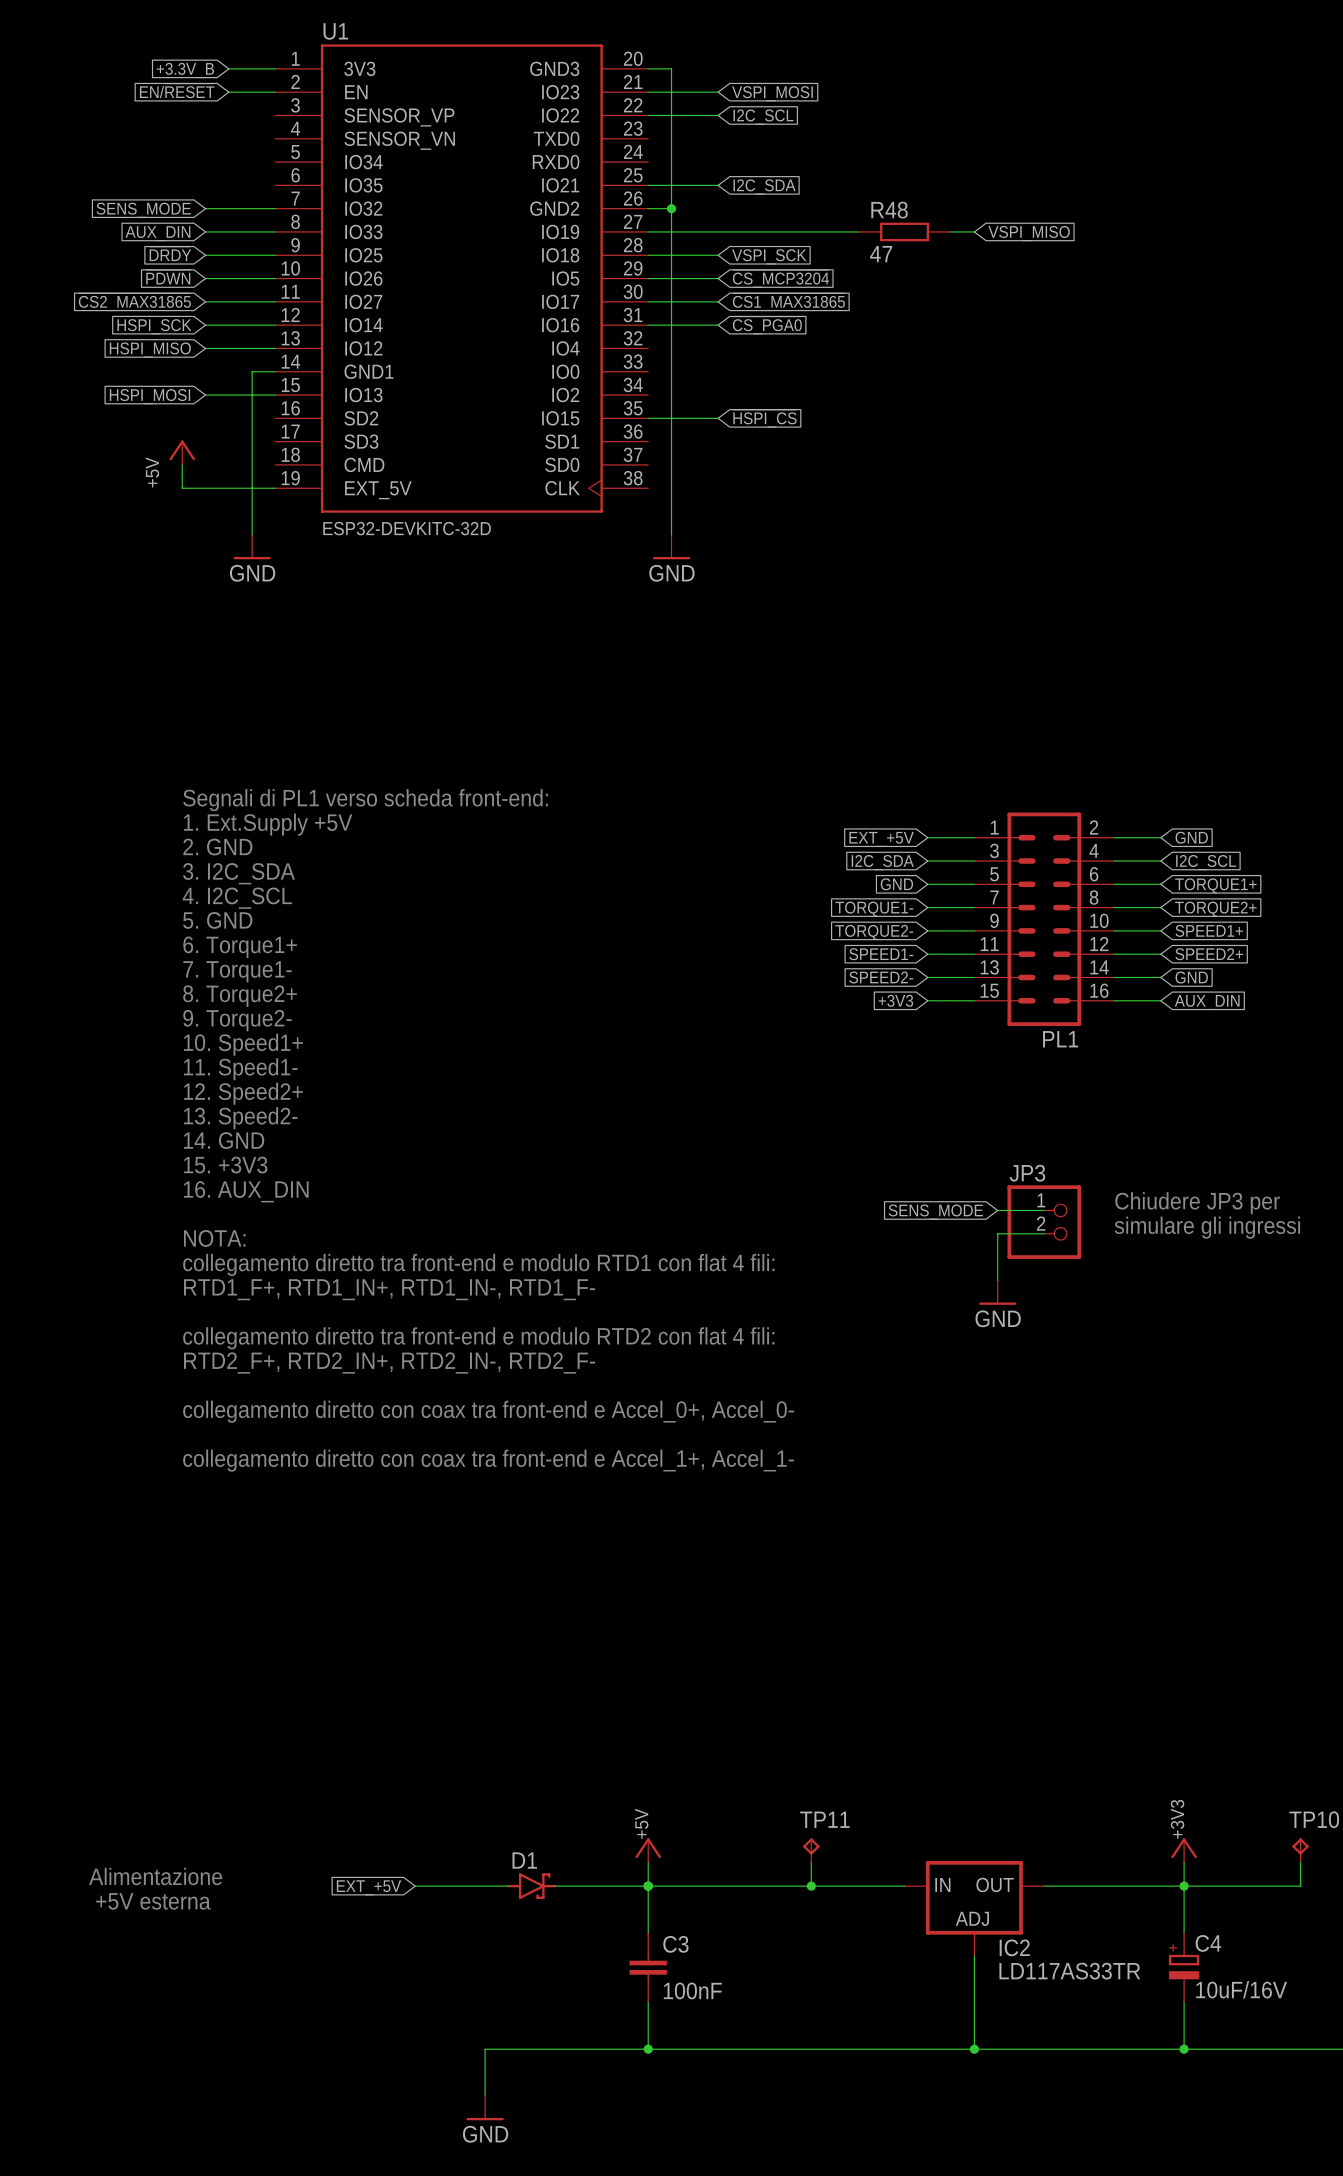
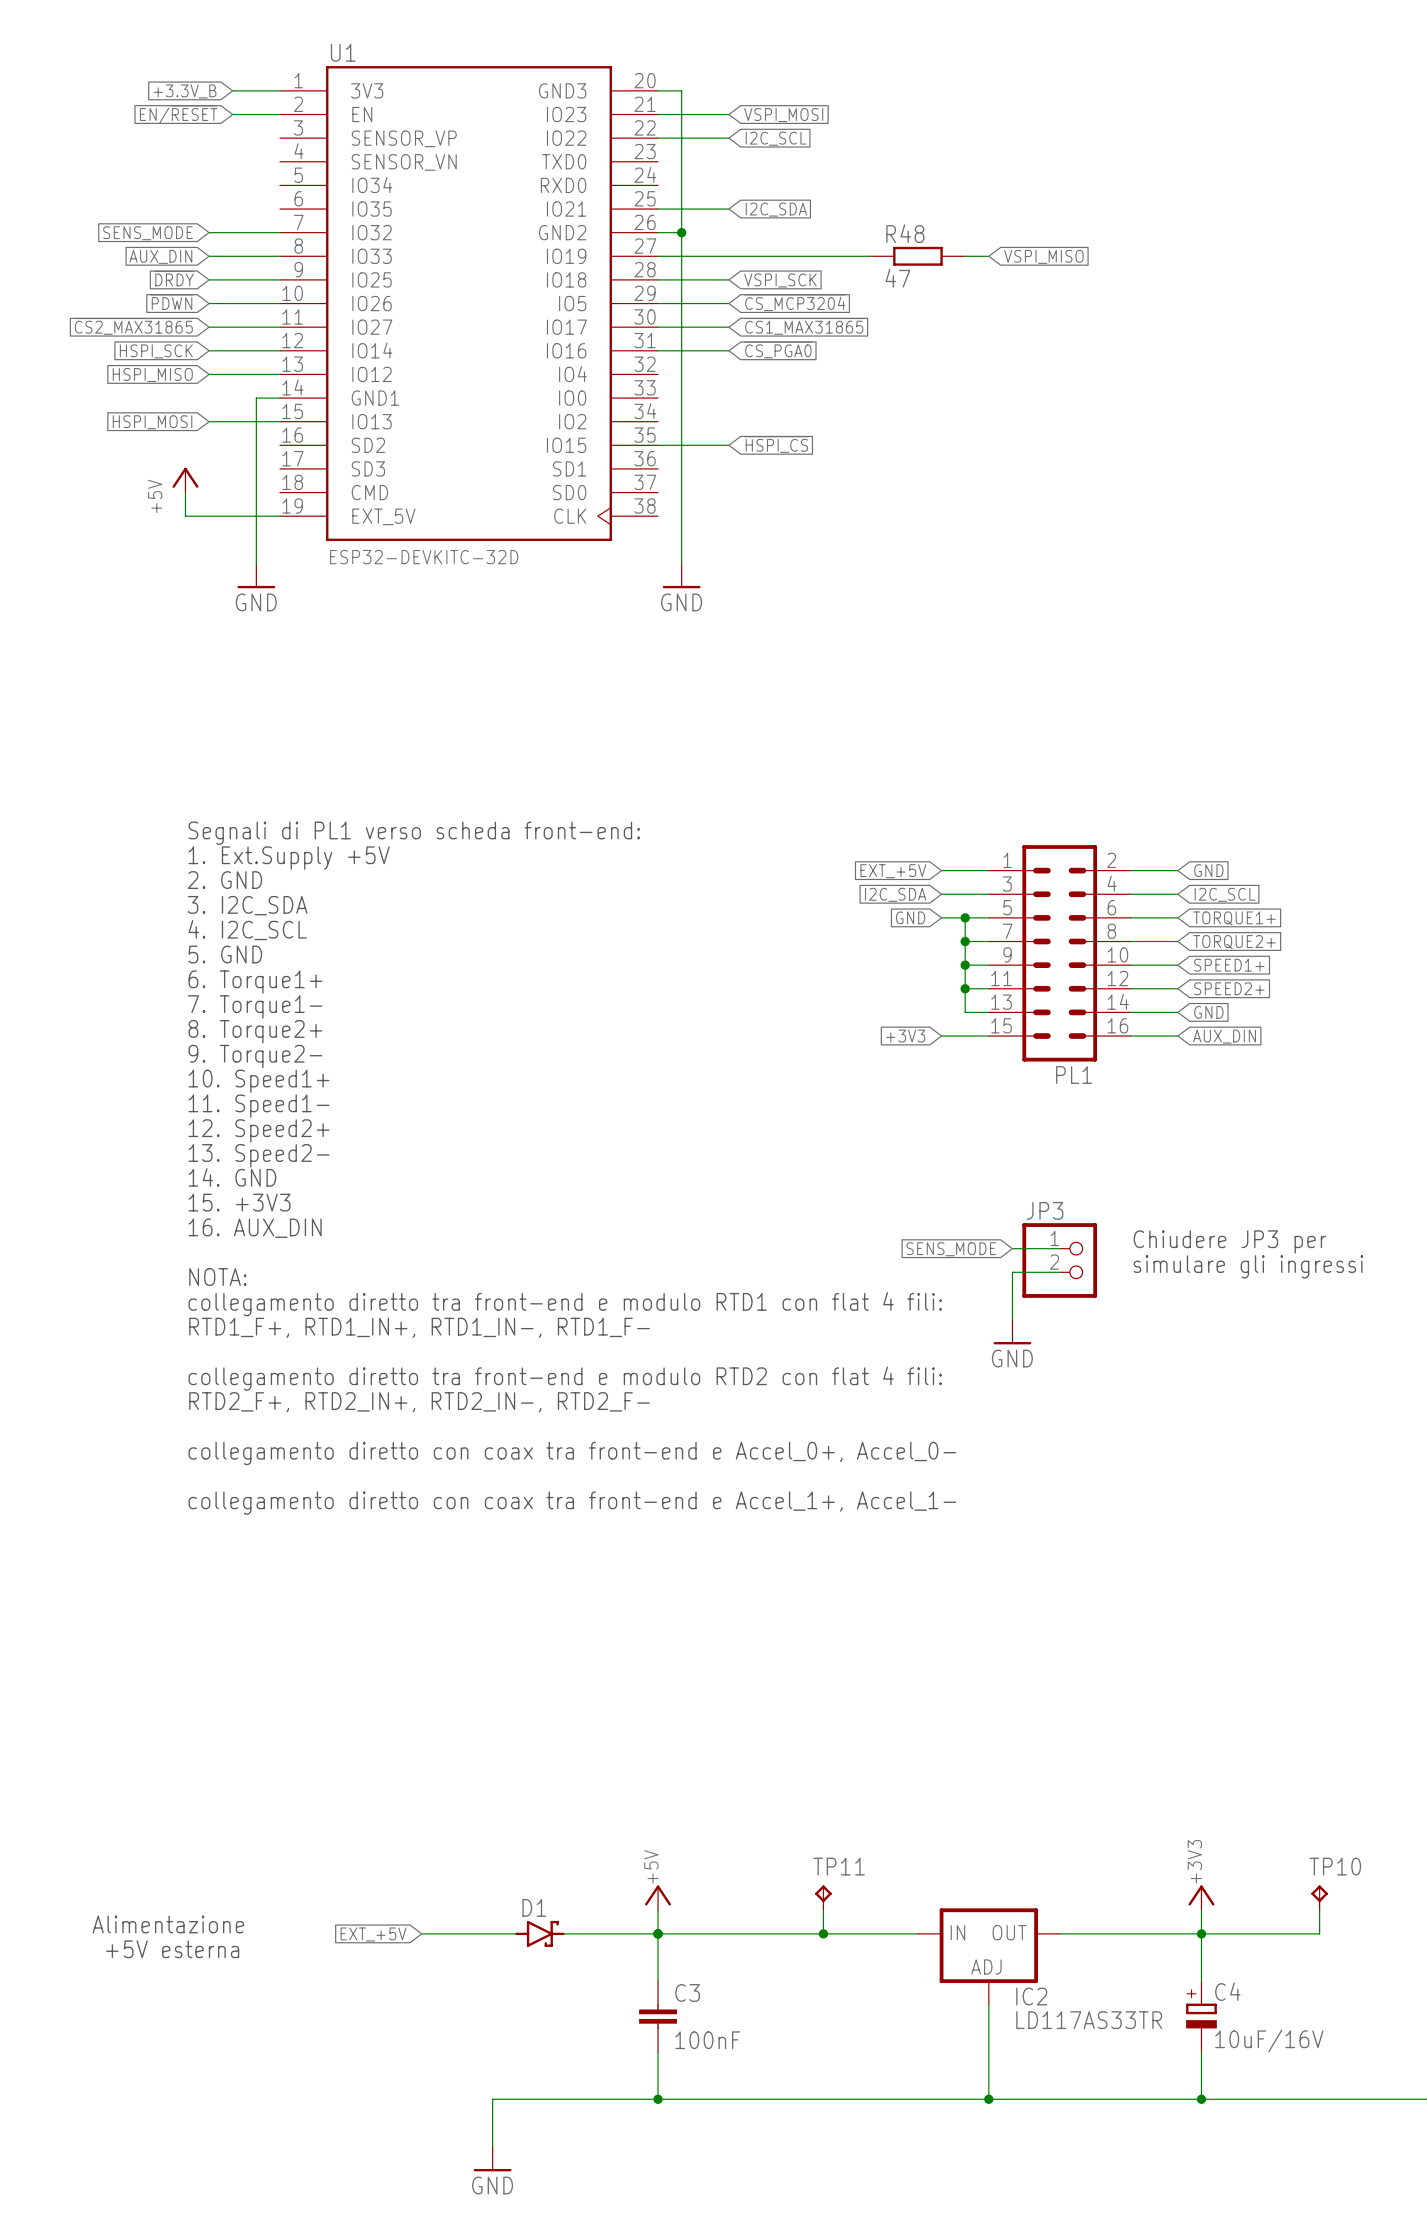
junction: none -> (965, 917)
wire: (927, 907) (951, 907) -> none
junction: none -> (965, 941)
global label: TORQUE1- (874, 909) -> none
wire: (927, 930) (951, 930) -> none
junction: none -> (965, 965)
global label: TORQUE2- (874, 932) -> none
global label: SPEED1- (881, 954) -> none
wire: (927, 954) (951, 954) -> none
junction: none -> (965, 988)
global label: SPEED2- (881, 977) -> none
wire: (927, 977) (951, 977) -> (965, 917) (965, 1012)

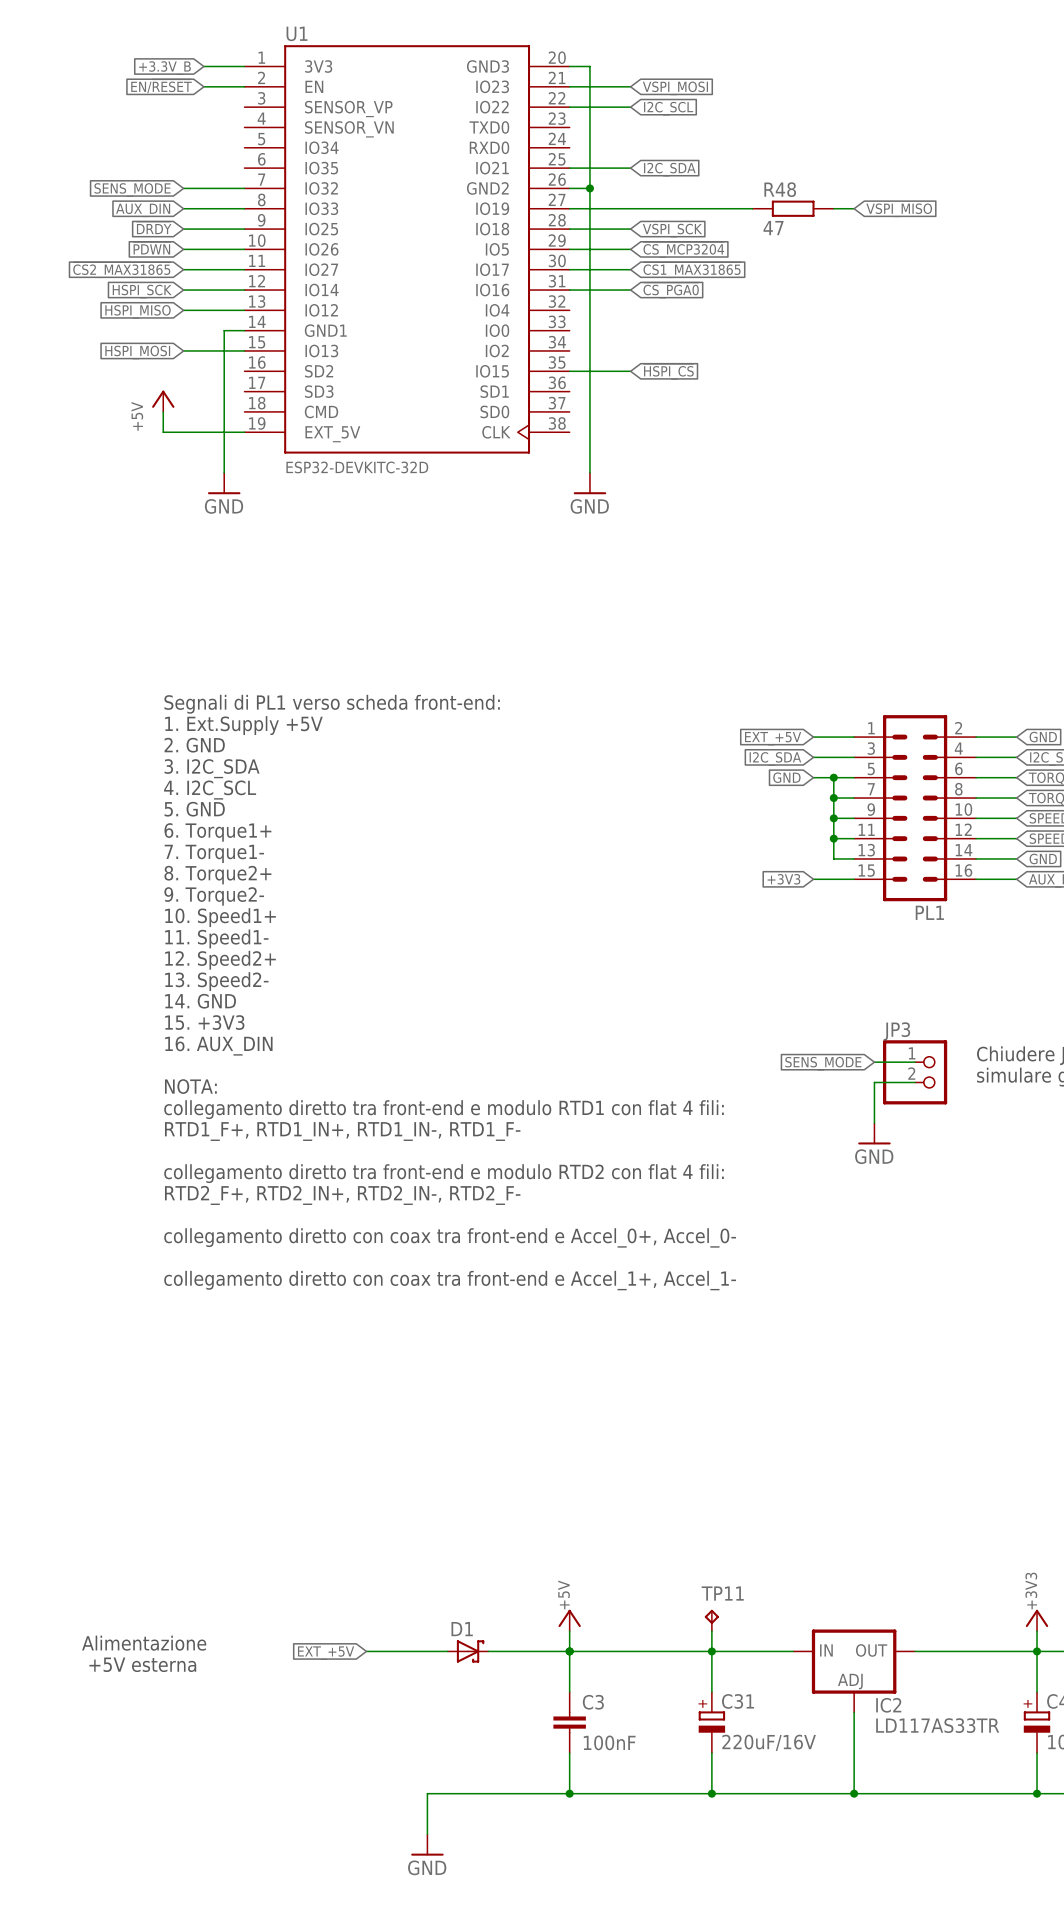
D1 symbol: [515, 1920, 565, 1947] -> [447, 1640, 489, 1663]
wire: none -> (711, 1651) (711, 1692)
C31: none -> 220uF/16V (711, 1722)
wire: none -> (711, 1753) (711, 1793)
junction: none -> (711, 1793)

